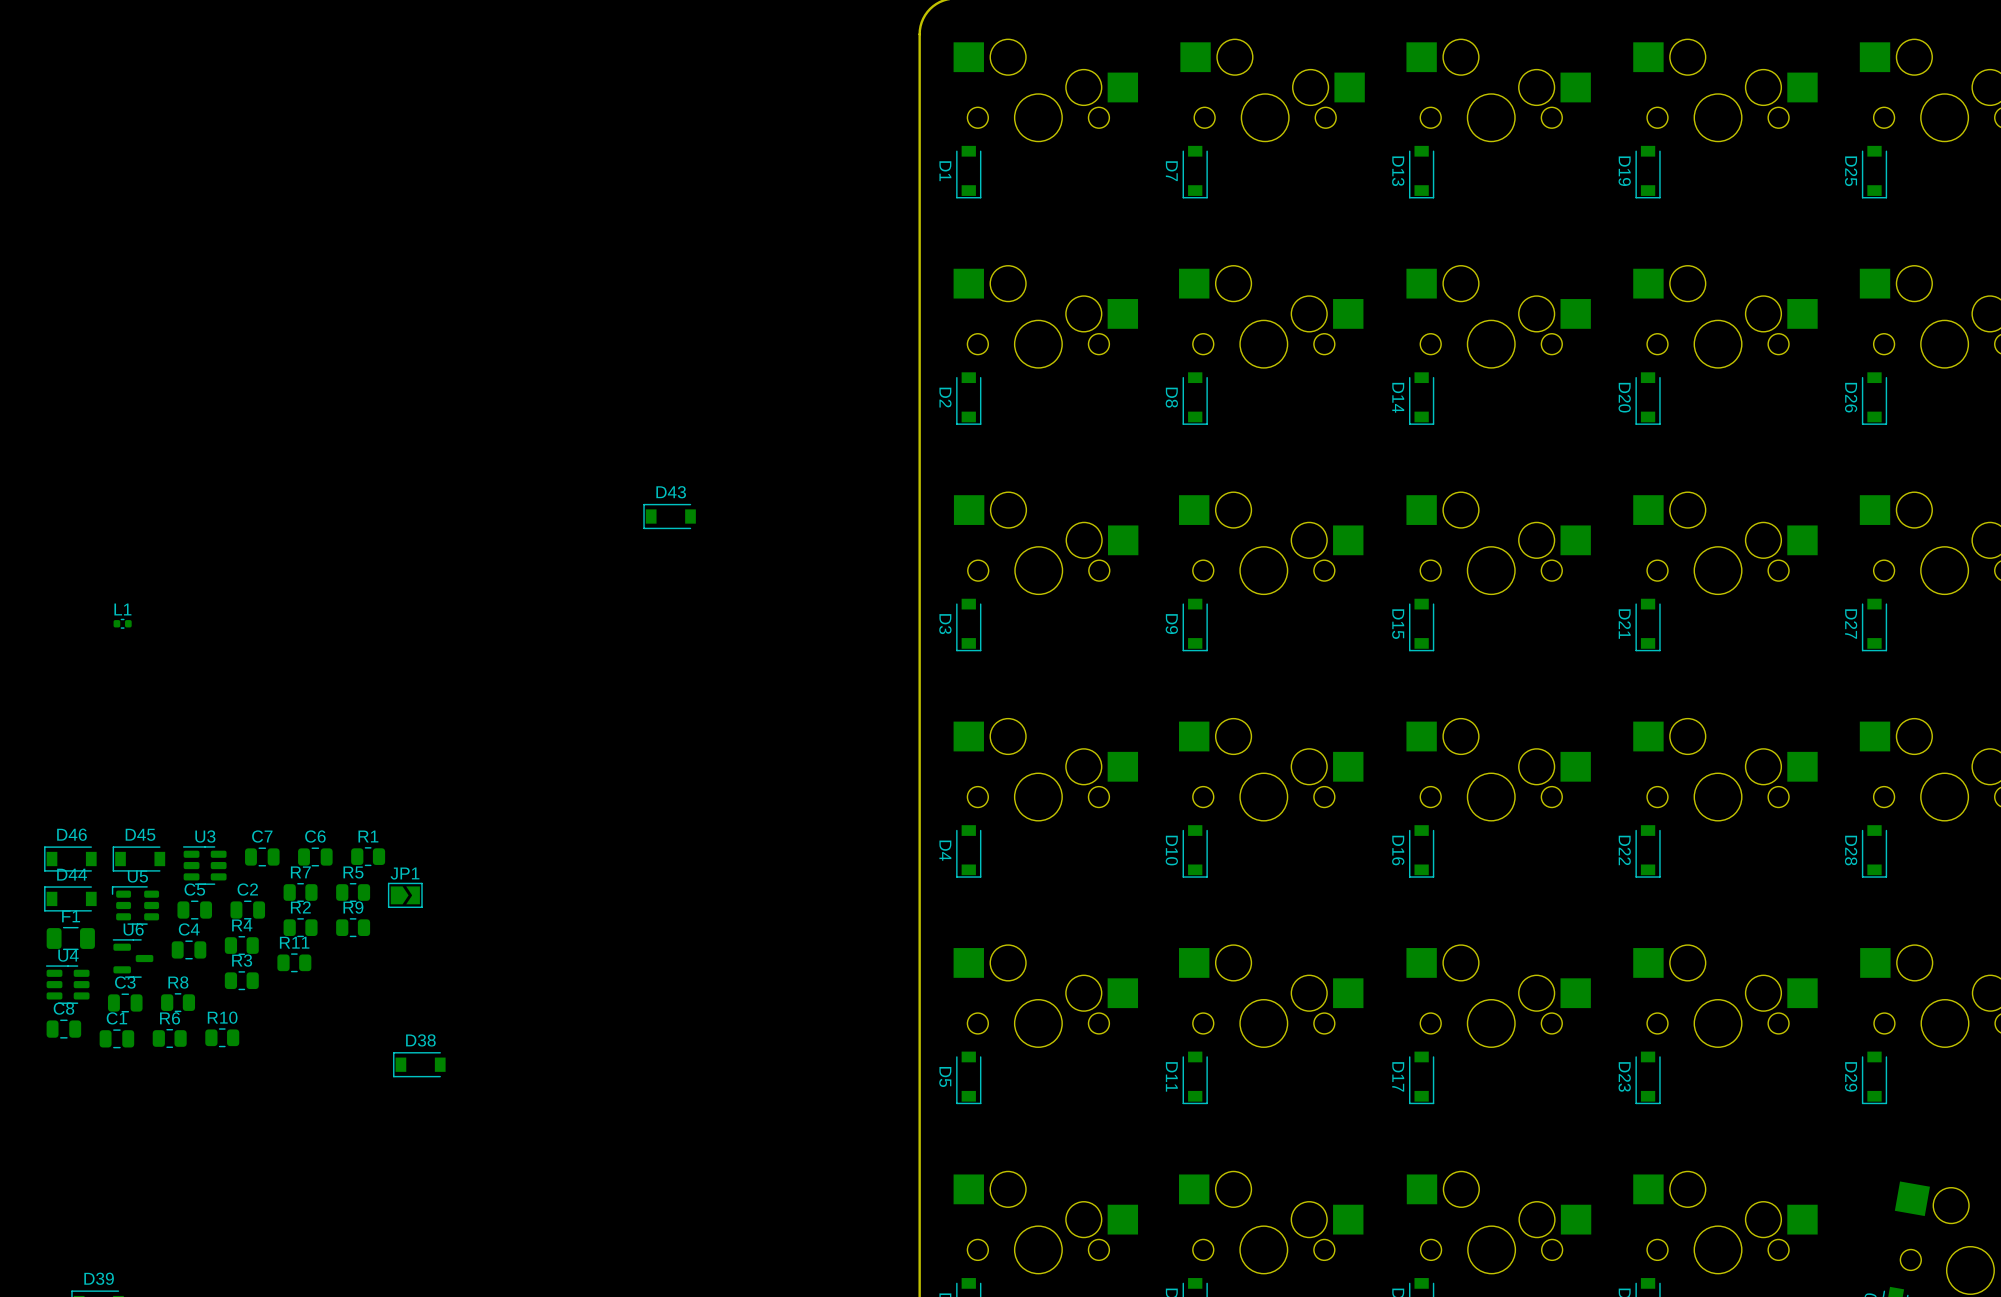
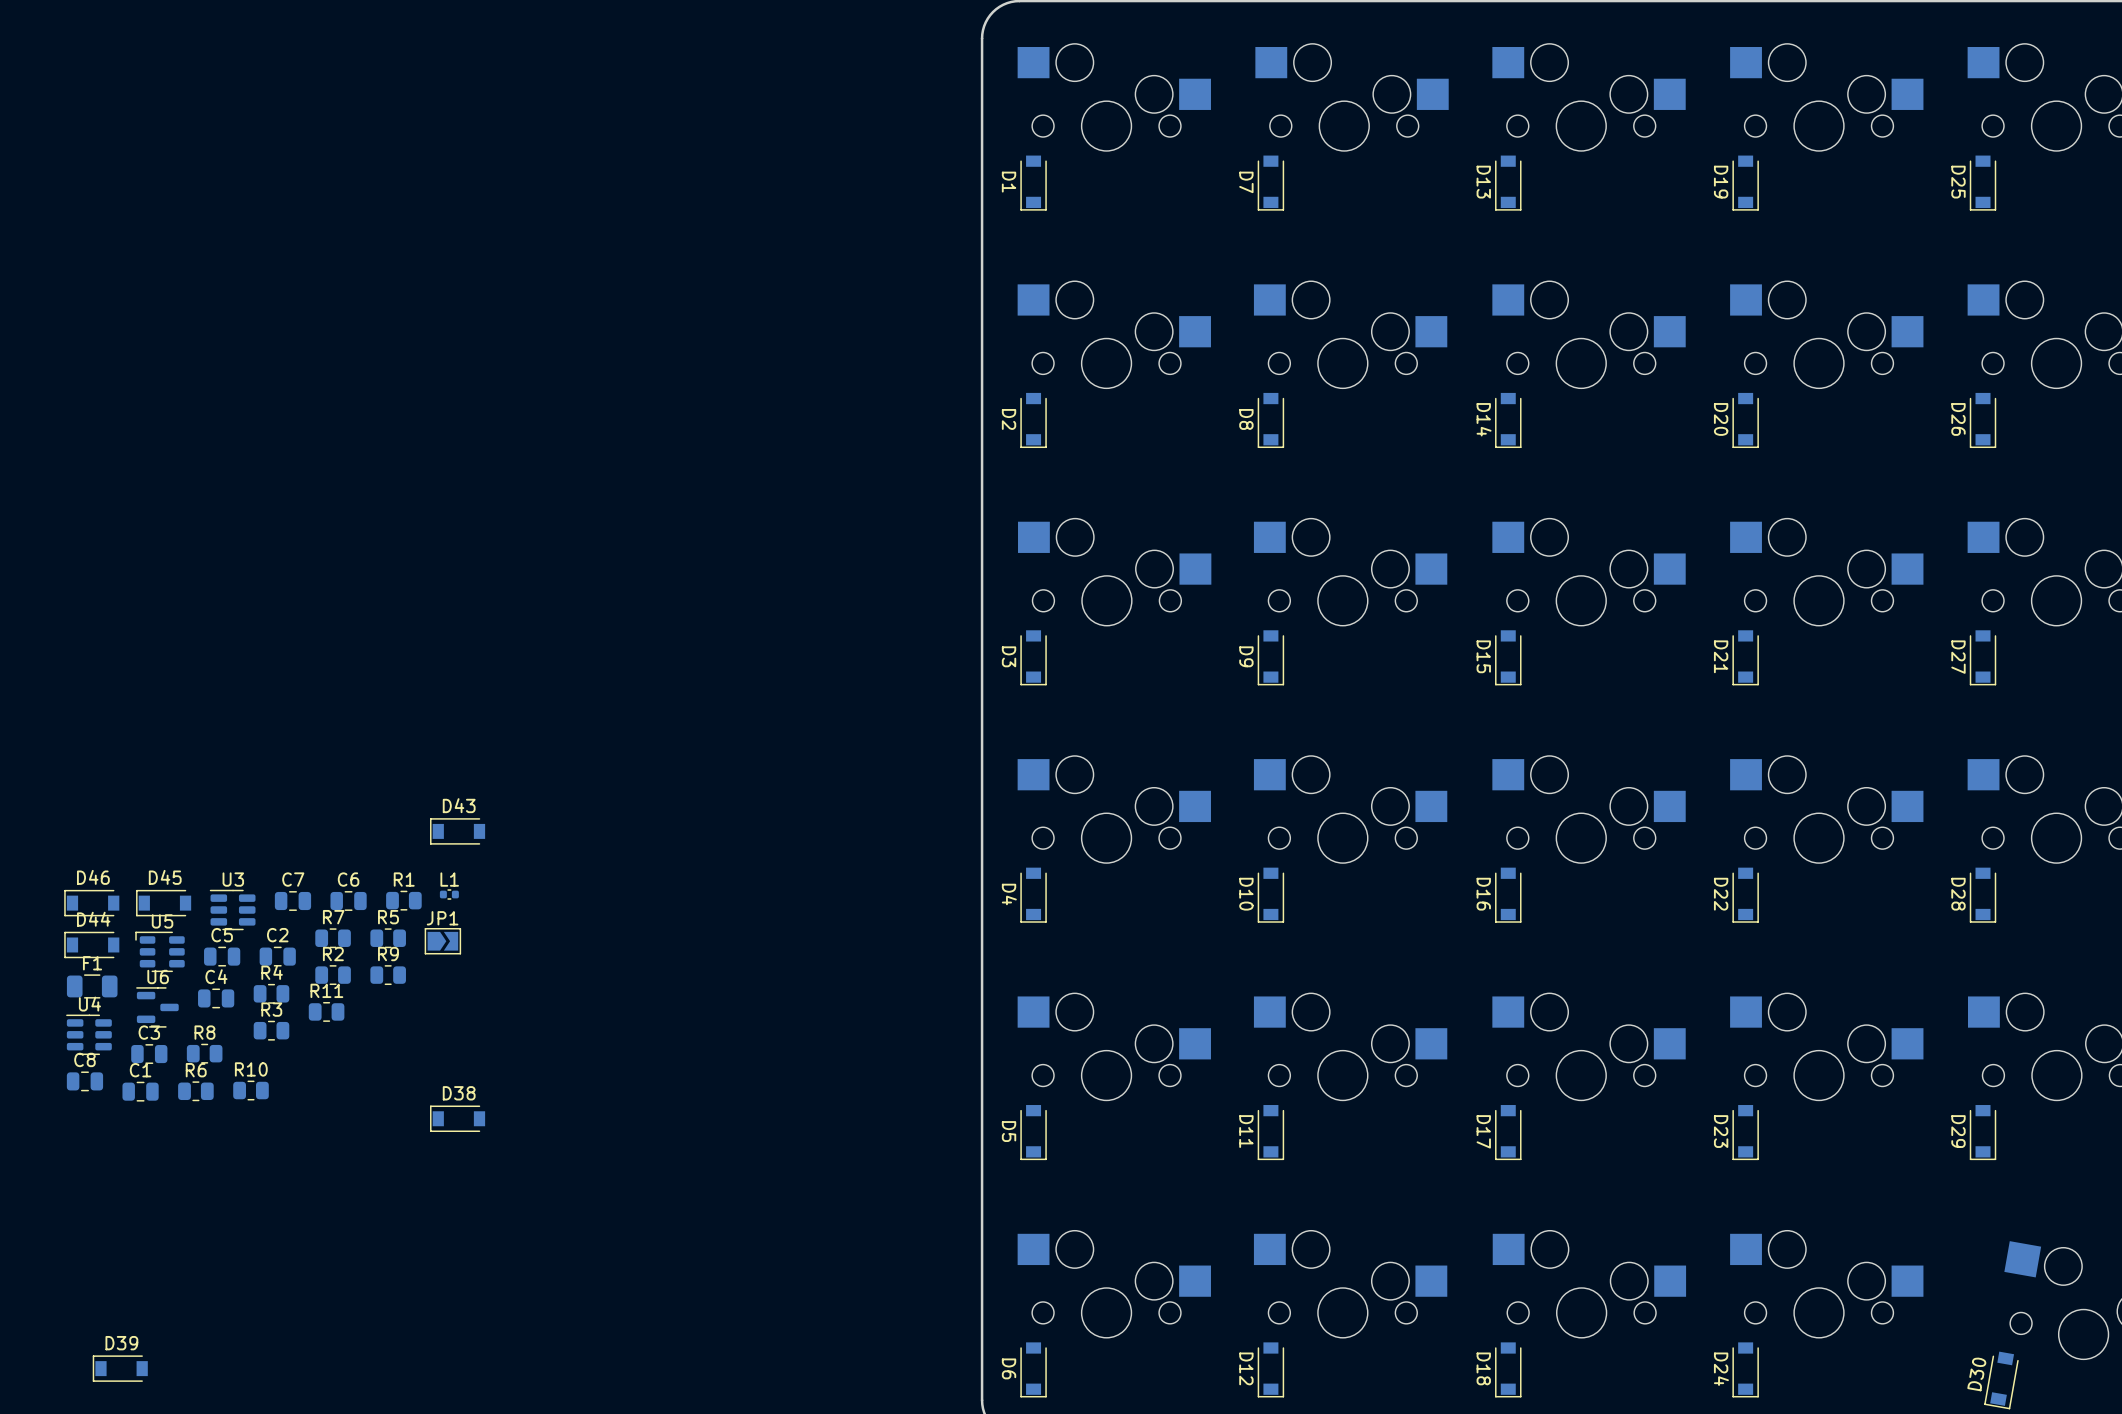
D43 position: (669, 516) -> (457, 831)
L1 position: (122, 623) -> (449, 894)

